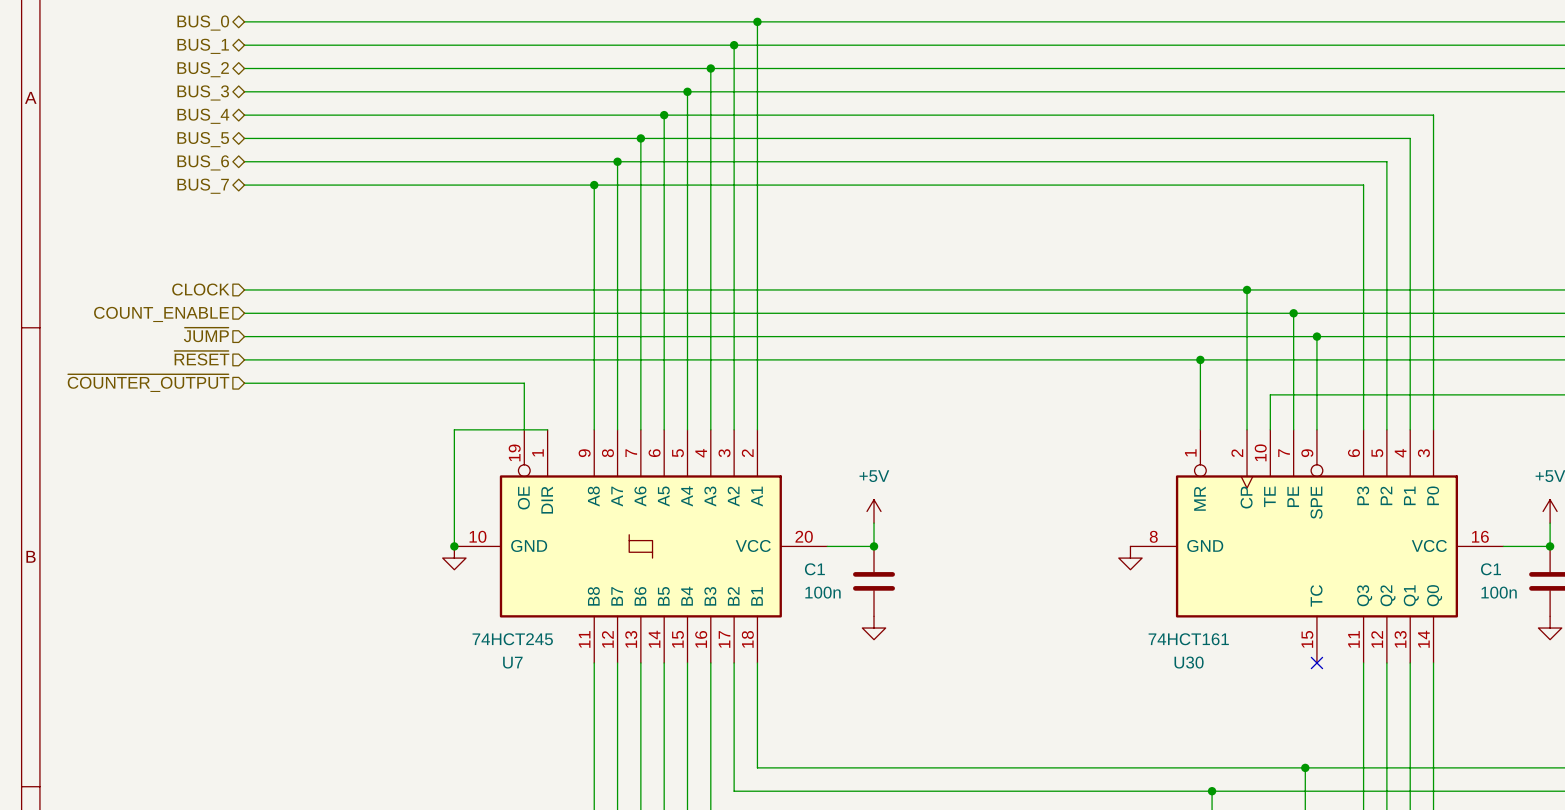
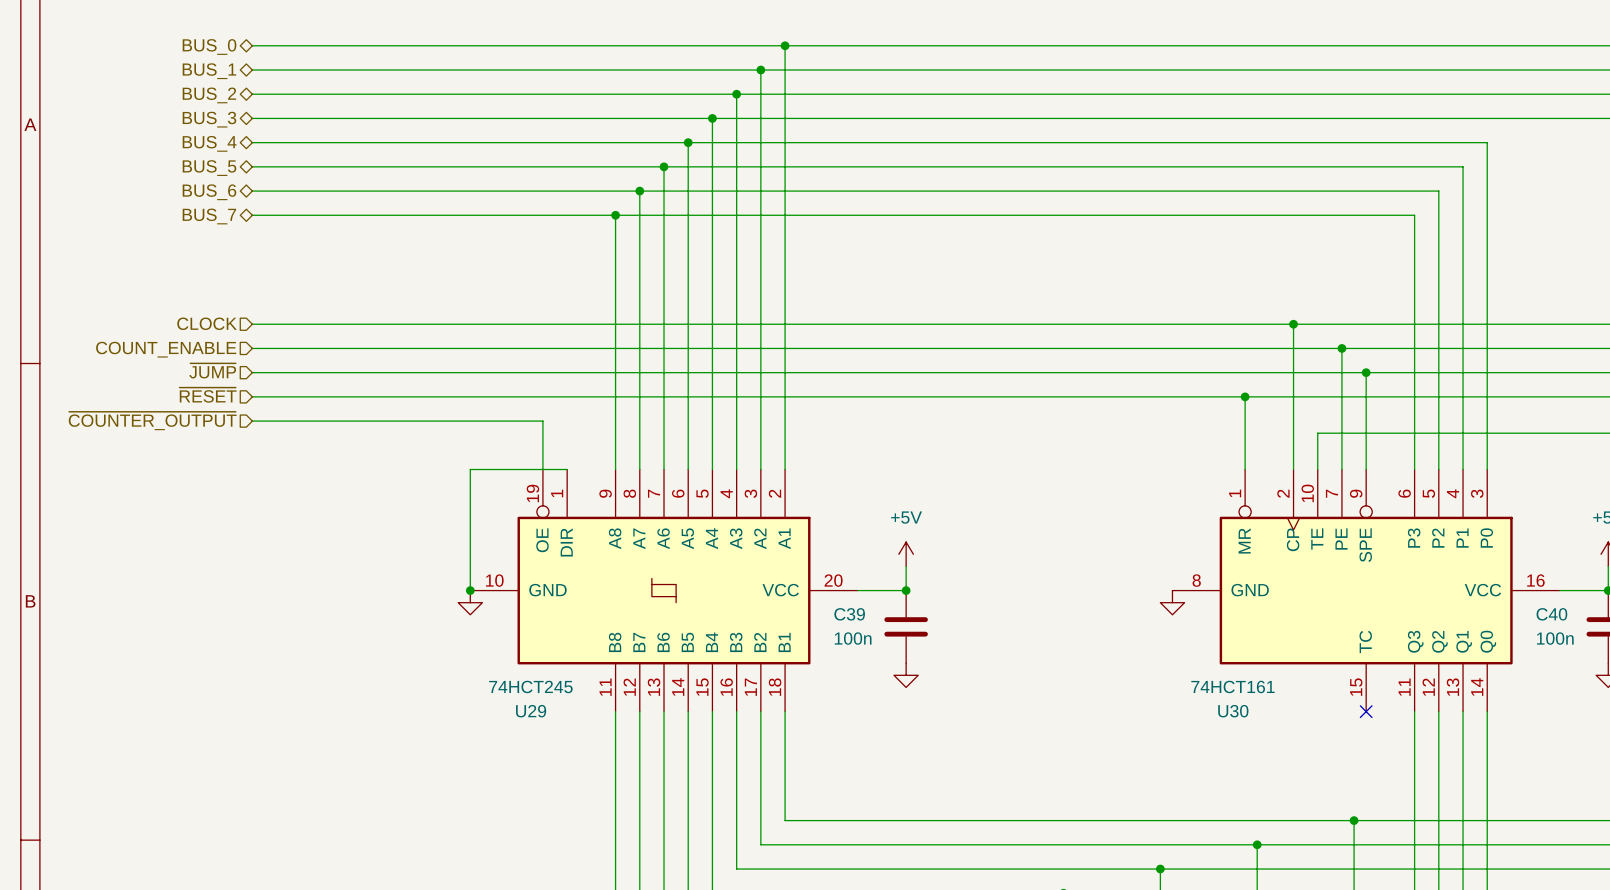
C1 name: C1 (814, 569) -> C39 (849, 614)
C1 name: C1 (1490, 569) -> C40 (1551, 614)
U7 name: U7 (512, 662) -> U29 (531, 711)

